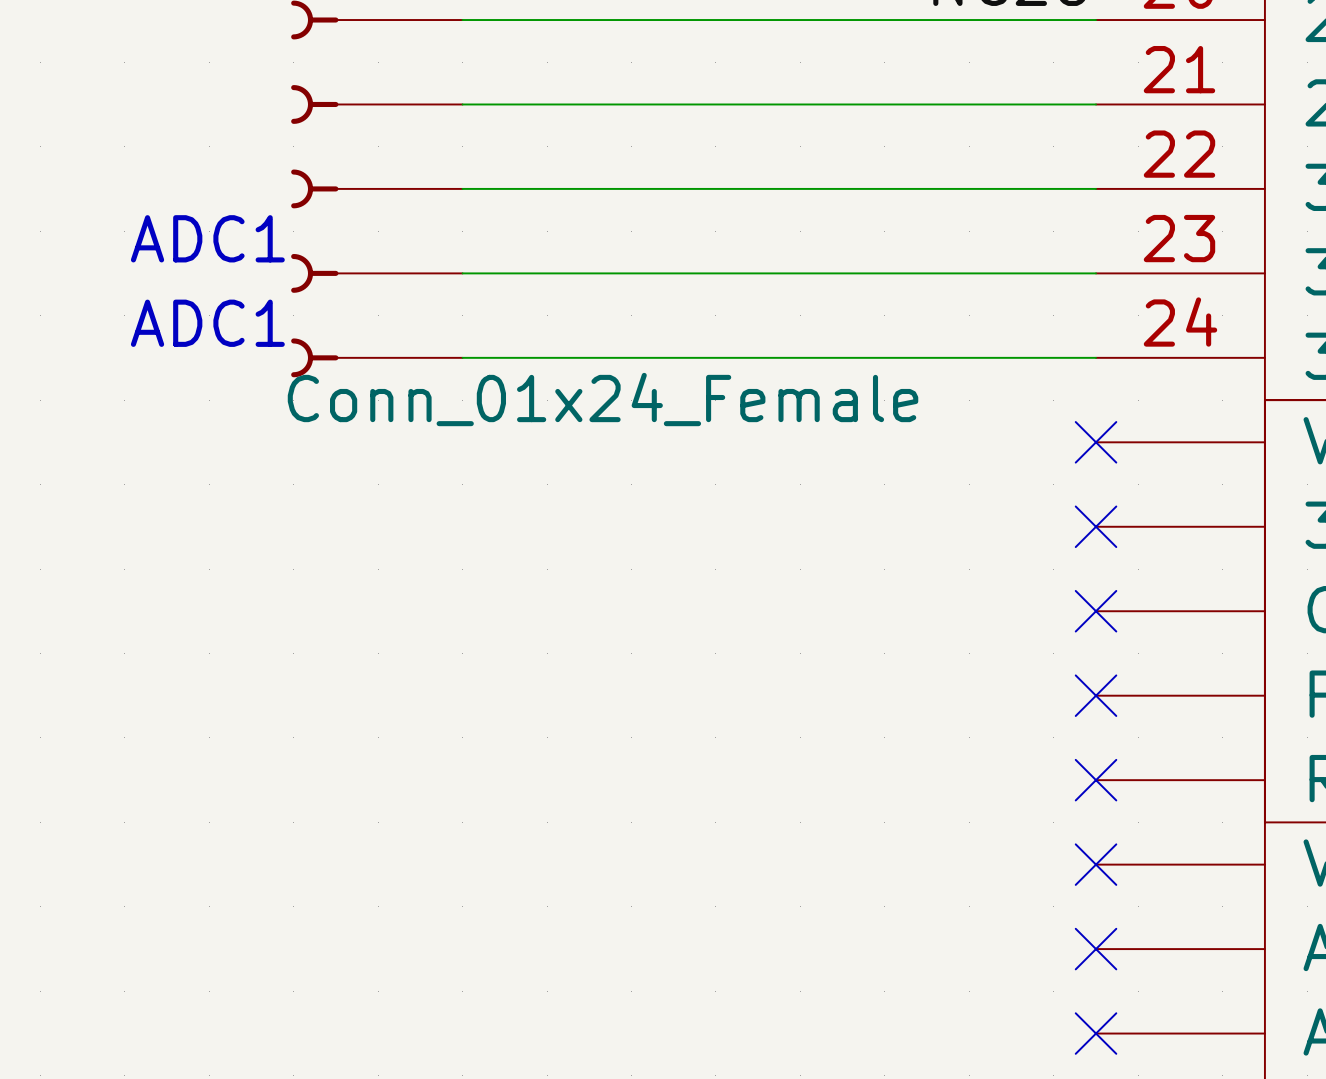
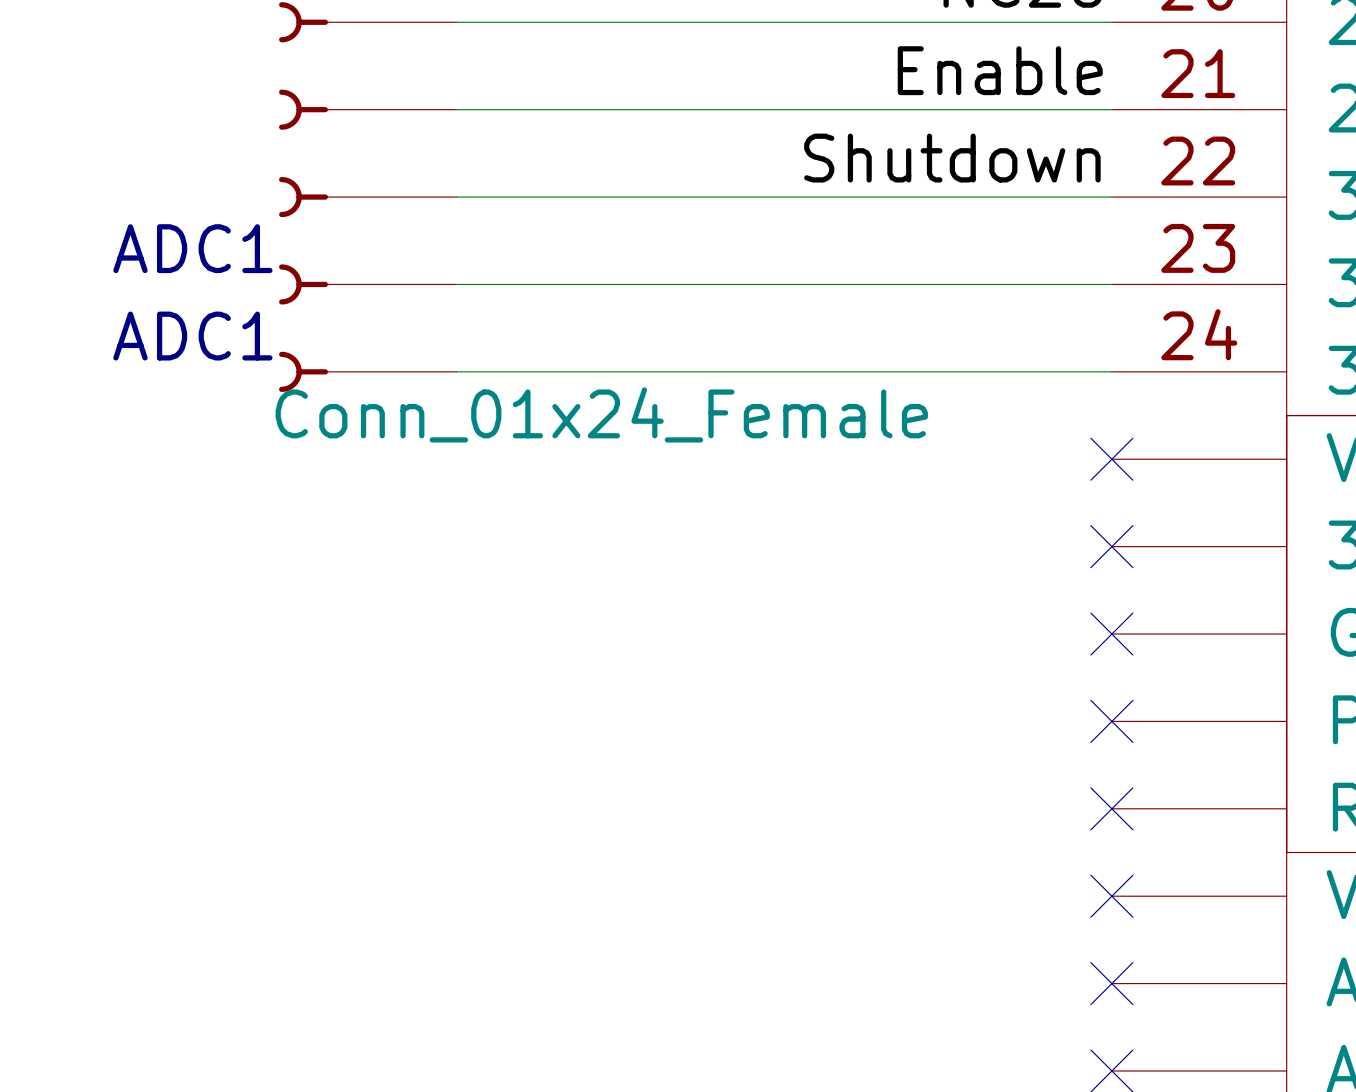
label: none -> Enable (1000, 70)
label: none -> Shutdown (952, 158)

